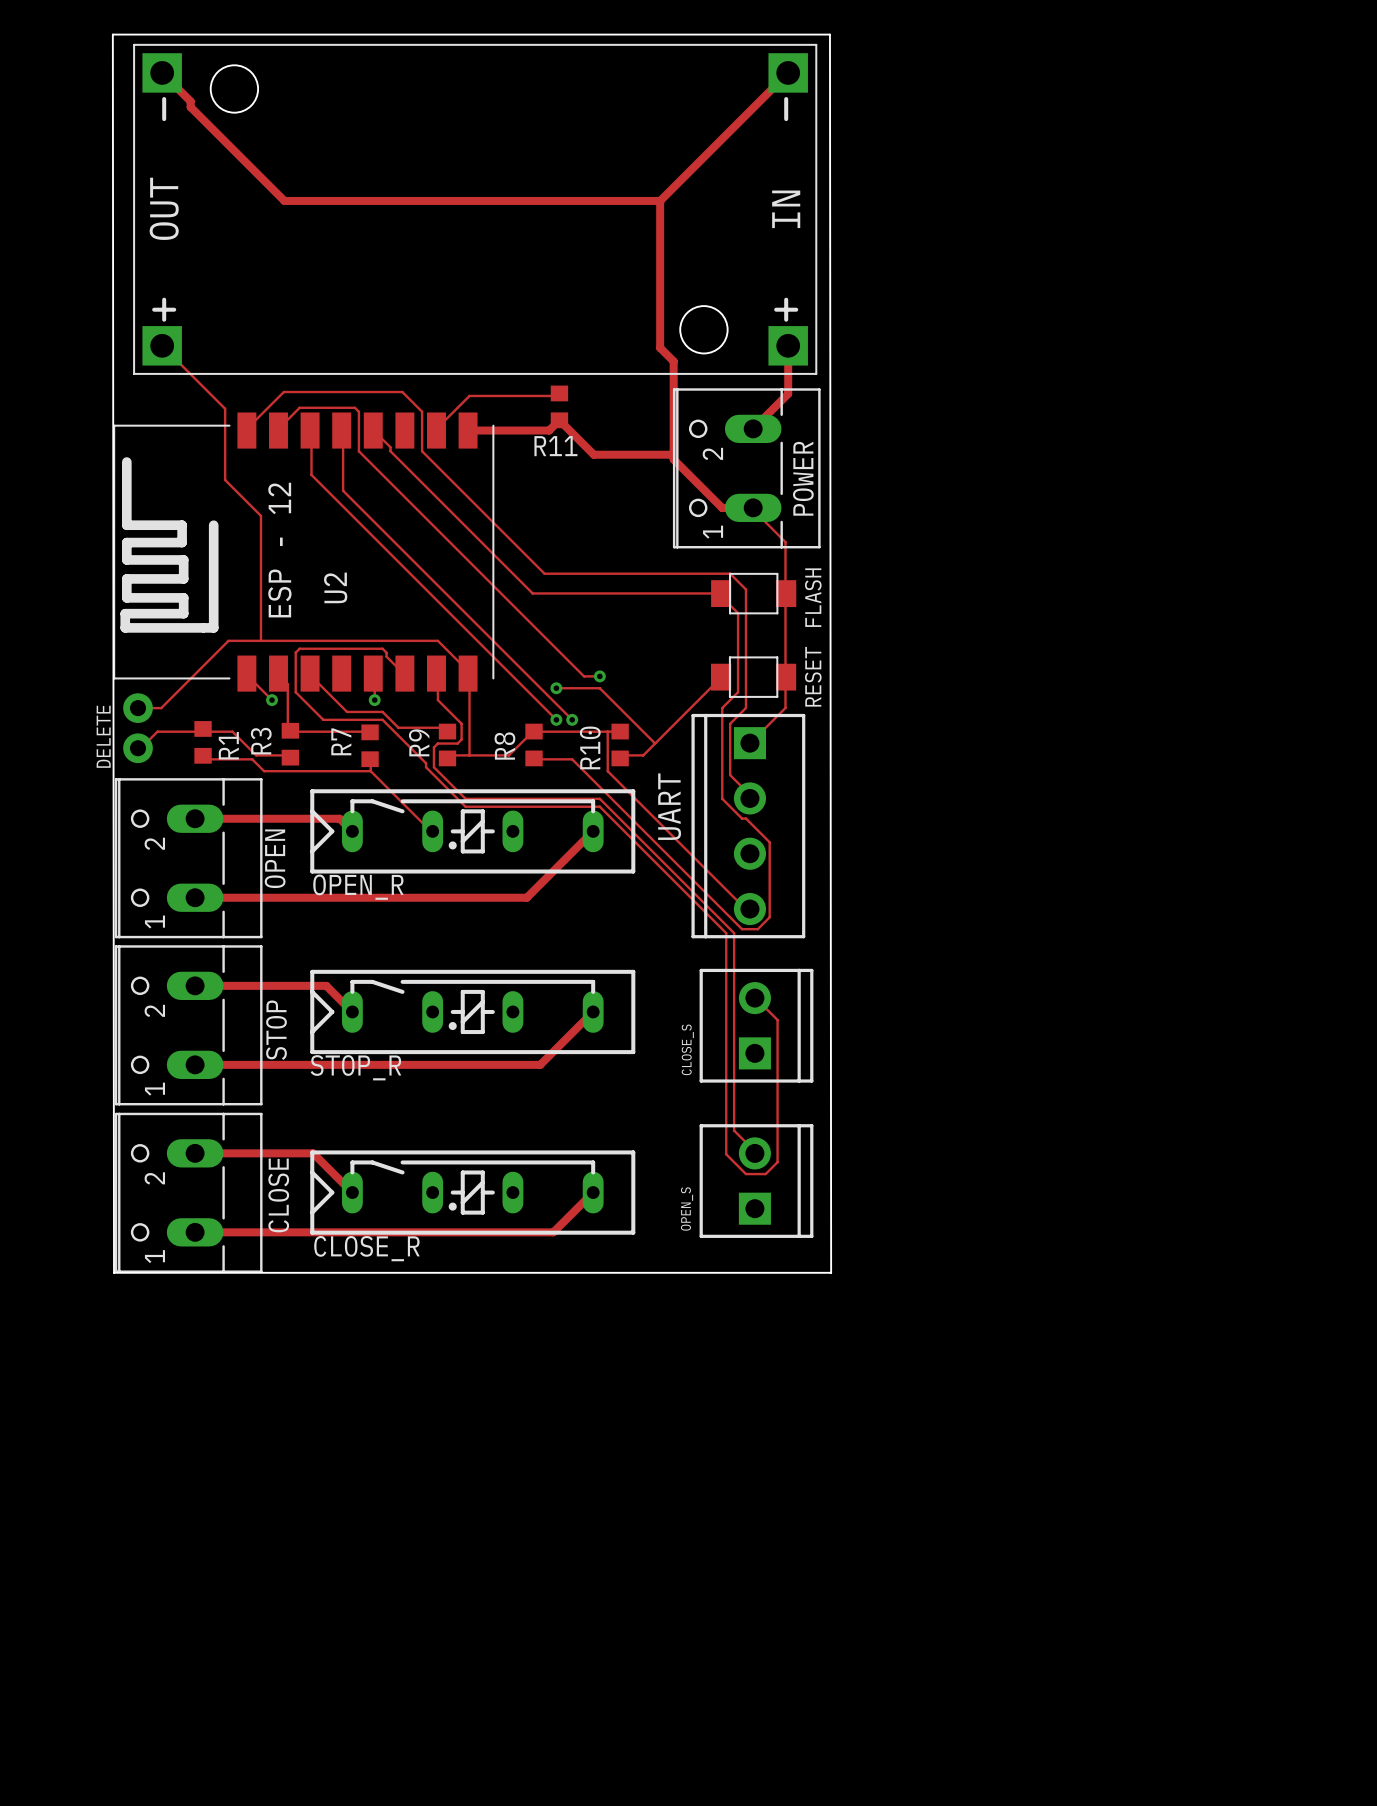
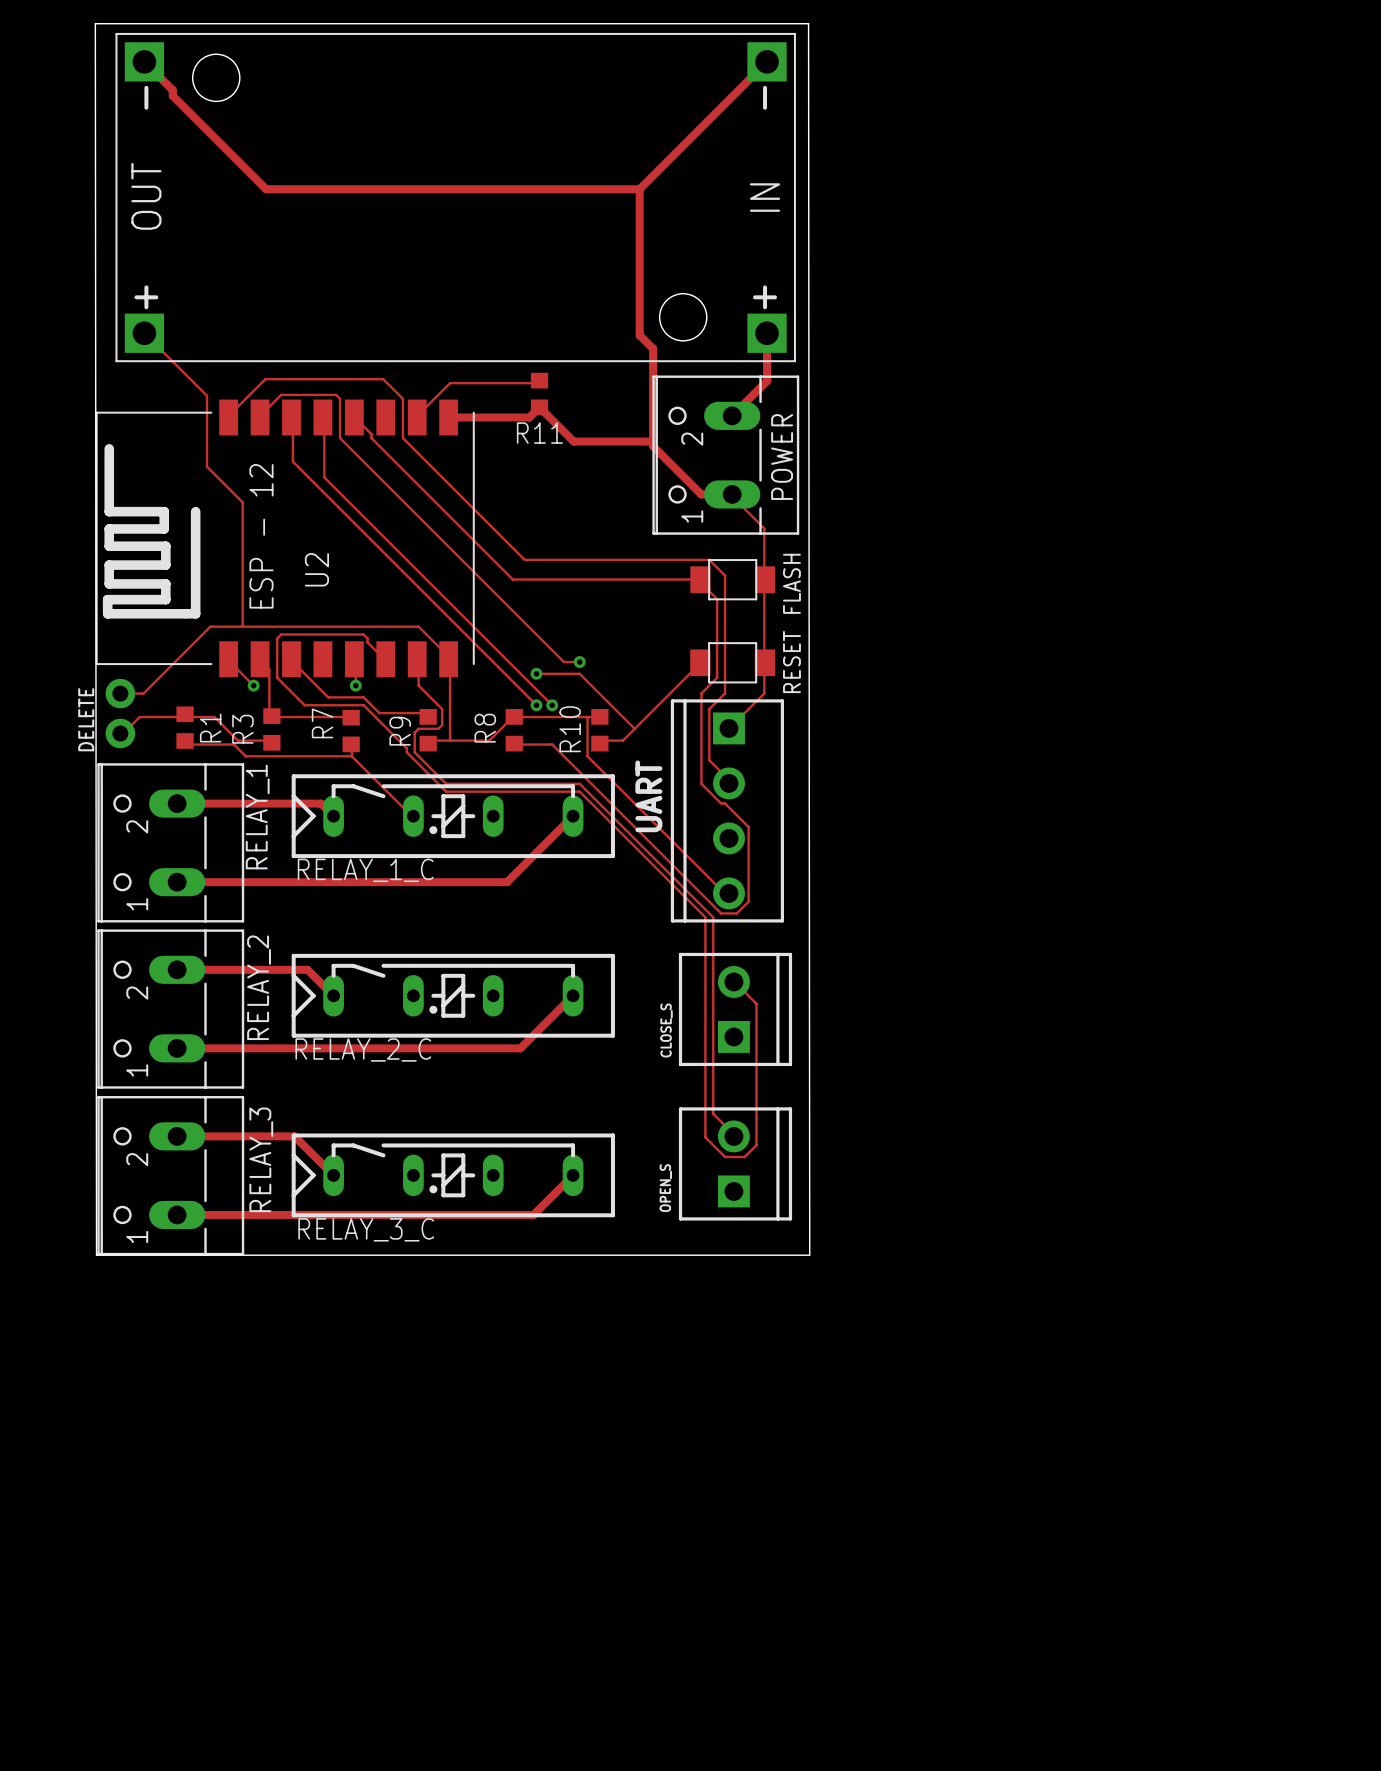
OPEN name: OPEN (275, 858) -> RELAY_1 (257, 817)
OPEN_R name: OPEN_R (358, 887) -> RELAY_1_C (365, 870)
STOP name: STOP (276, 1030) -> RELAY_2 (259, 987)
STOP_R name: STOP_R (355, 1067) -> RELAY_2_C (363, 1049)
CLOSE name: CLOSE (278, 1195) -> RELAY_3 (261, 1159)
CLOSE_R name: CLOSE_R (366, 1248) -> RELAY_3_C (366, 1229)

